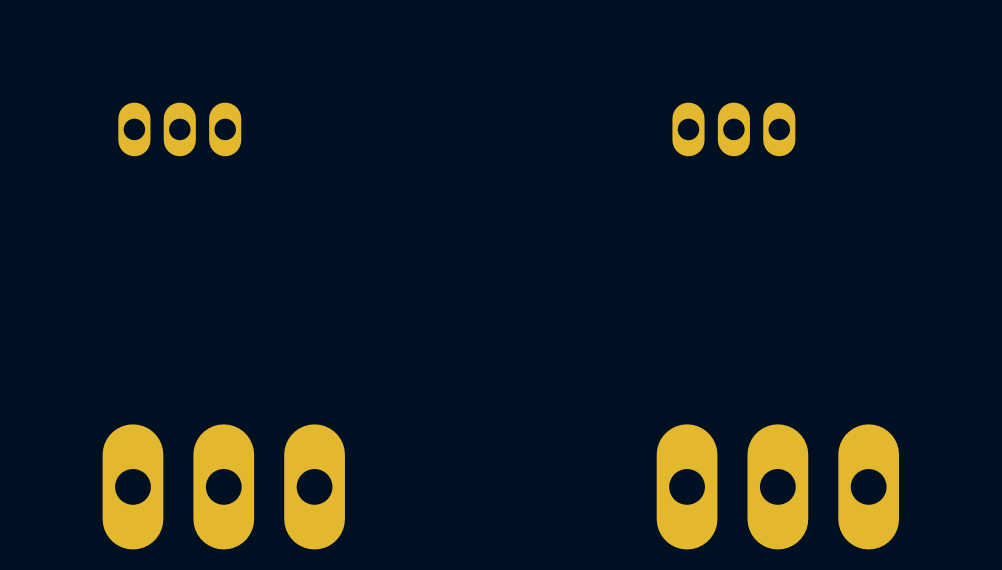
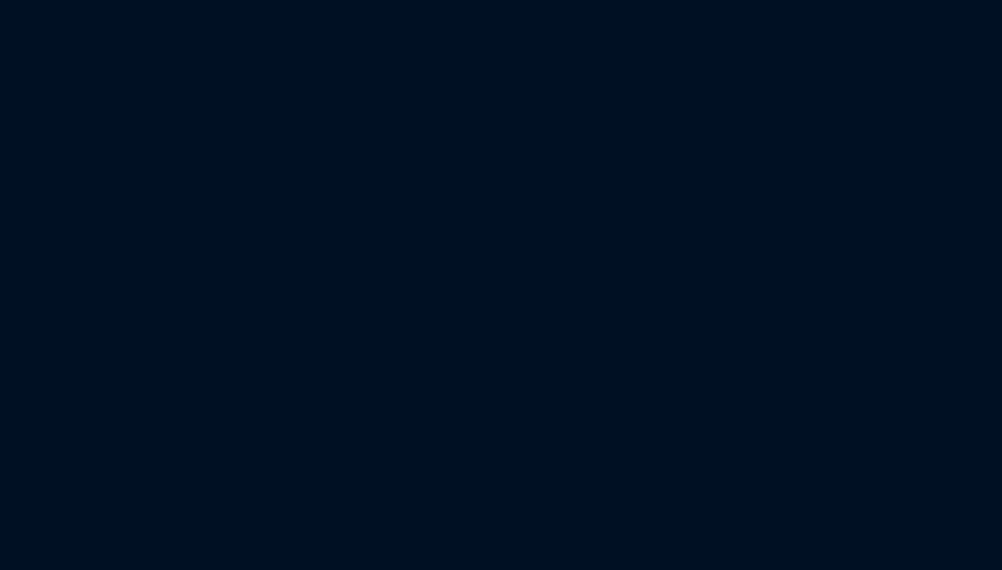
part: (179, 129) -> none
part: (733, 129) -> none
part: (223, 486) -> none
part: (777, 486) -> none

